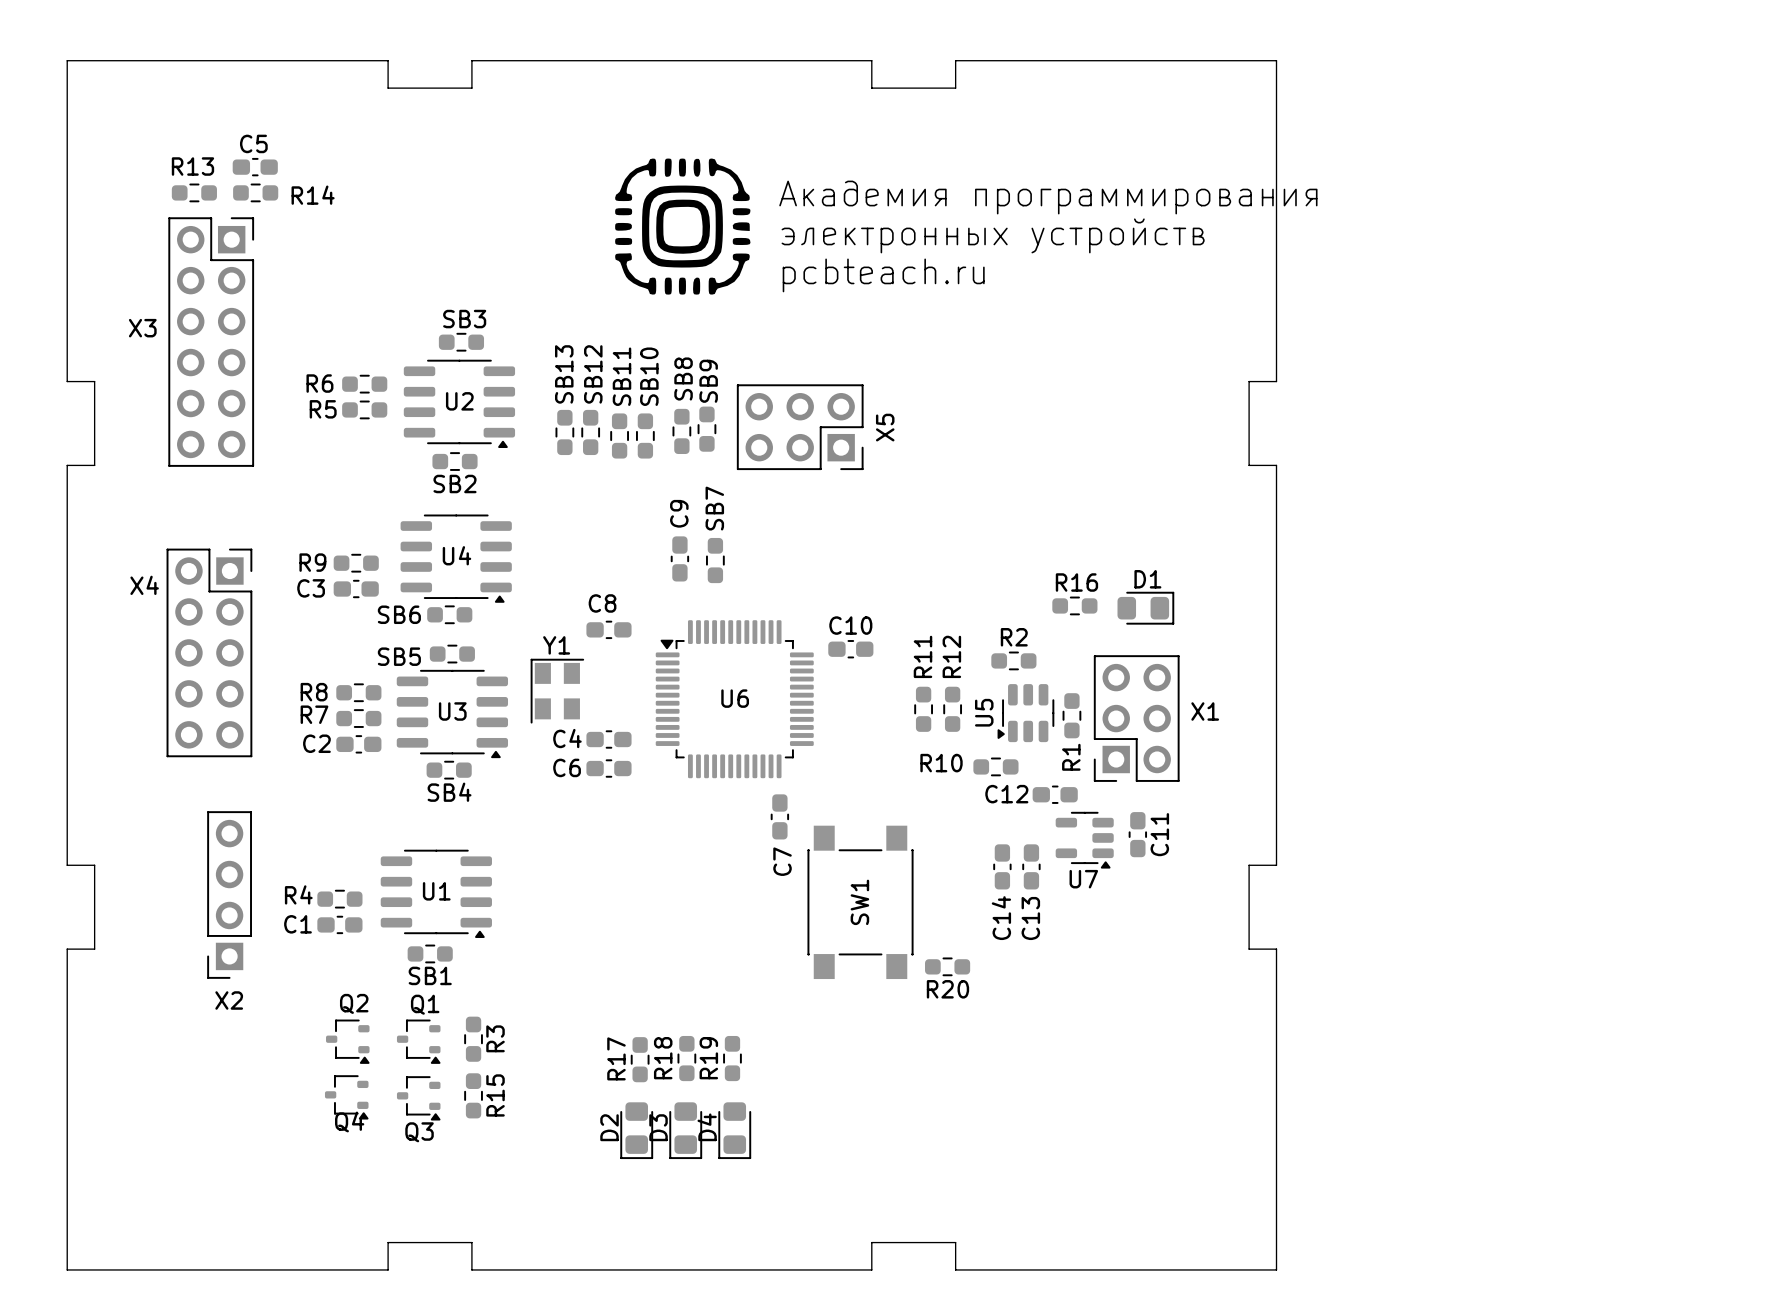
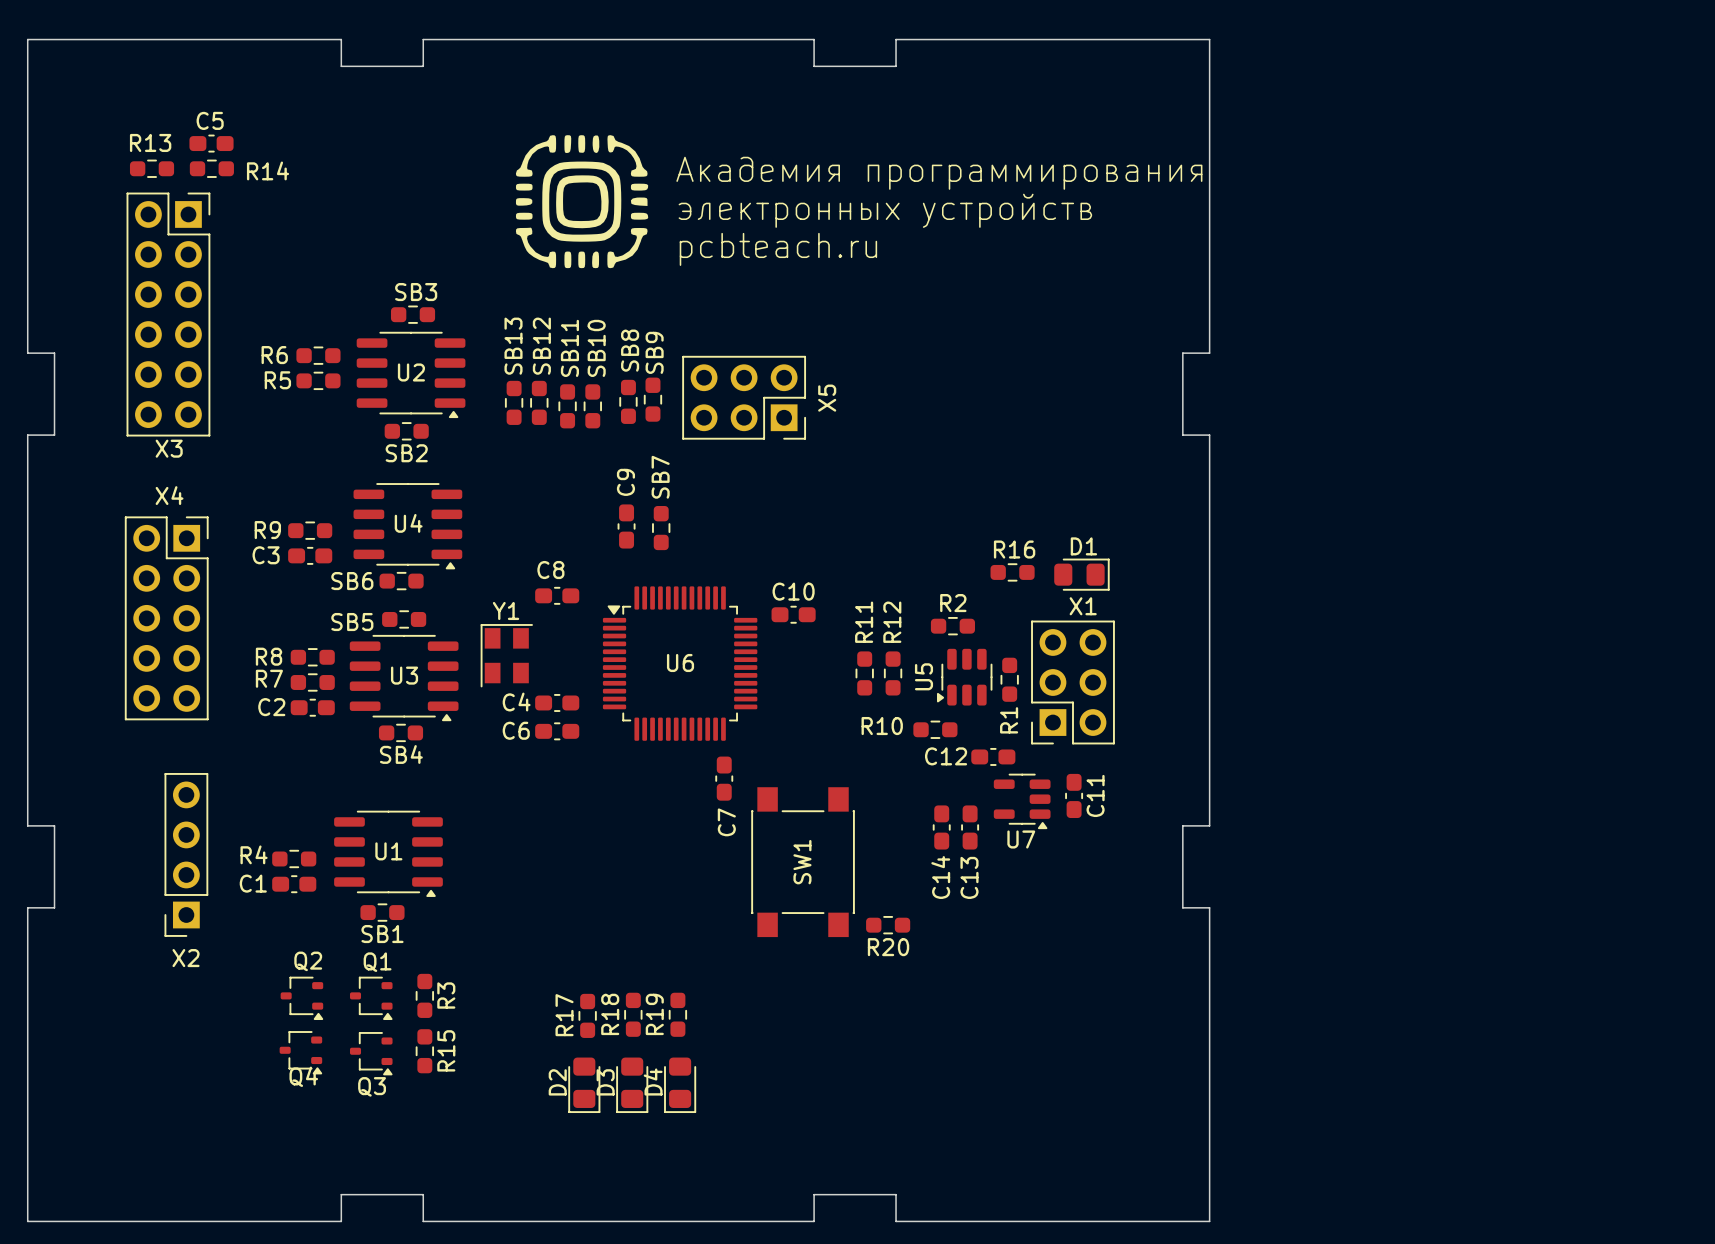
text position: Академия программирования (1048, 197) -> Академия программирования (939, 173)
drawing position: (682, 226) -> (582, 201)
text position: электронных устройств (993, 235) -> электронных устройств (885, 210)
text position: pcbteach.ru (883, 275) -> pcbteach.ru (778, 249)
X3 name position: X3 (142, 328) -> X3 (169, 448)
X4 name position: X4 (144, 585) -> X4 (169, 495)
X1 name position: X1 (1205, 711) -> X1 (1083, 606)

